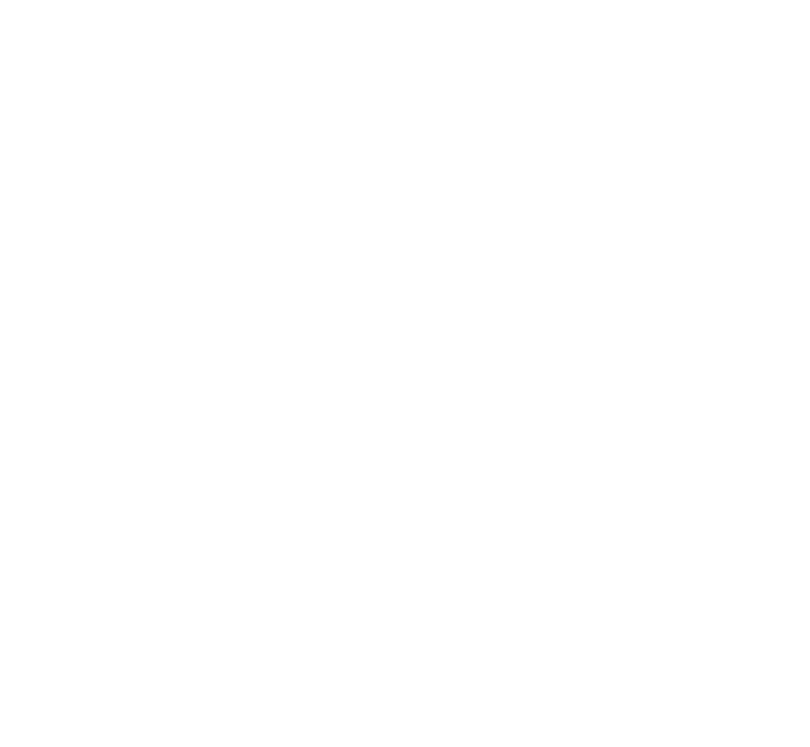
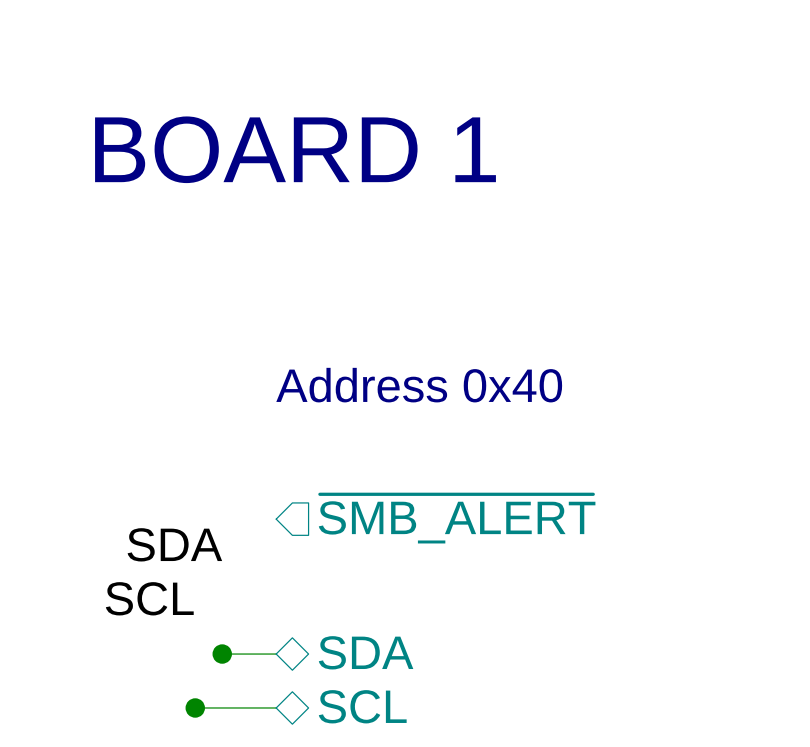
text: none -> BOARD 1 (295, 149)
text: none -> Address 0x40 (419, 385)
sheet pin: none -> ~{SMB_ALERT} (457, 518)
label: none -> SDA (174, 544)
label: none -> SCL (149, 598)
sheet pin: none -> SDA (366, 652)
wire: none -> (222, 654) (276, 654)
junction: none -> (222, 654)
sheet pin: none -> SCL (362, 706)
wire: none -> (195, 707) (276, 707)
junction: none -> (195, 707)

